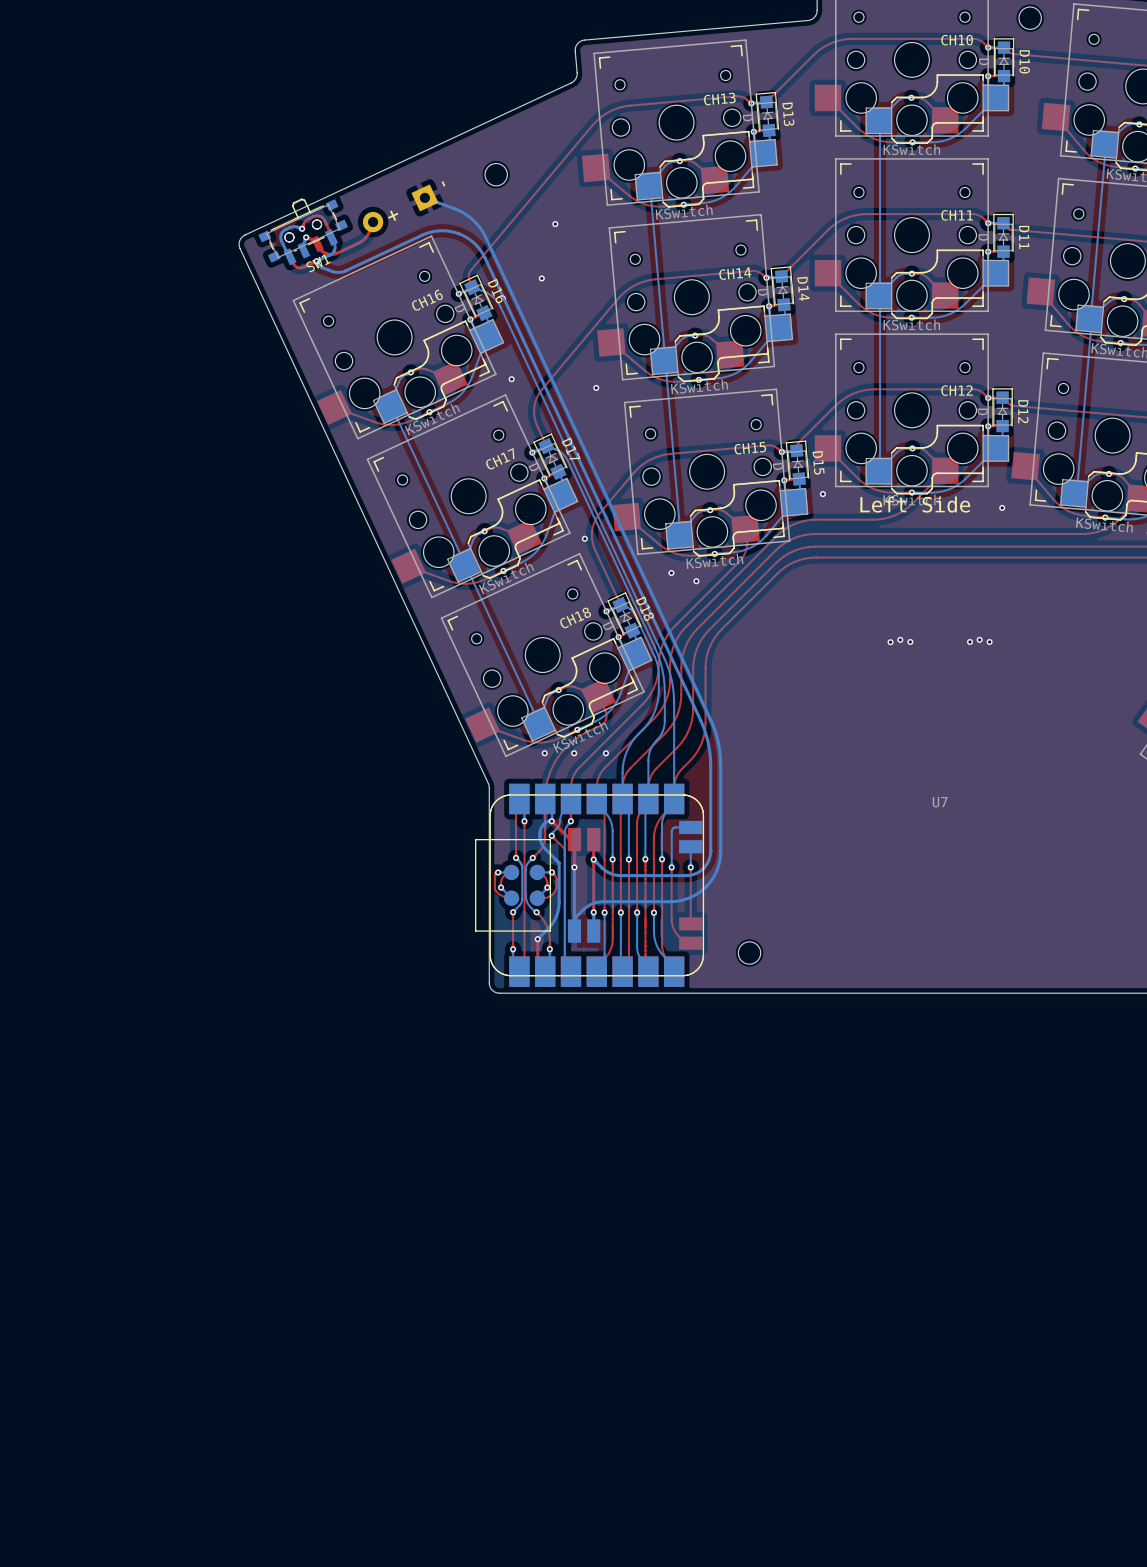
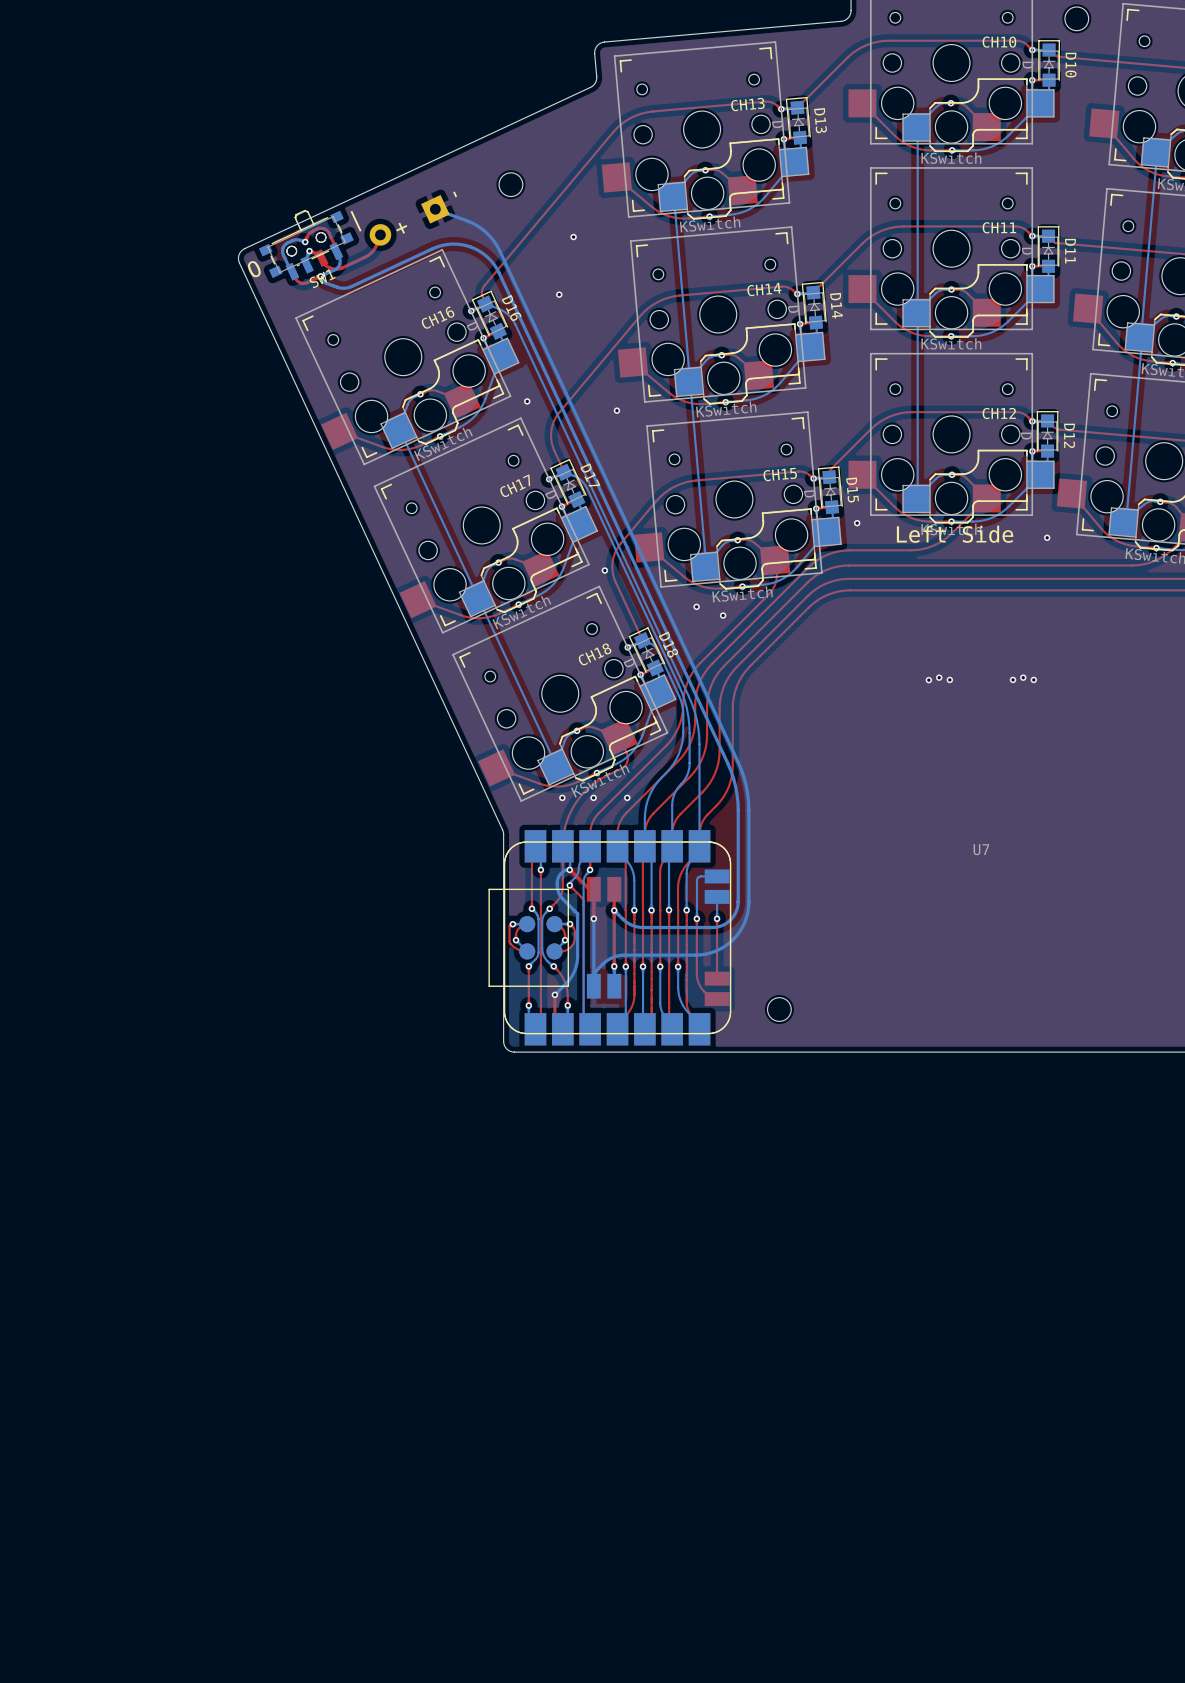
text: none -> | (356, 221)
text: none -> O (254, 269)

